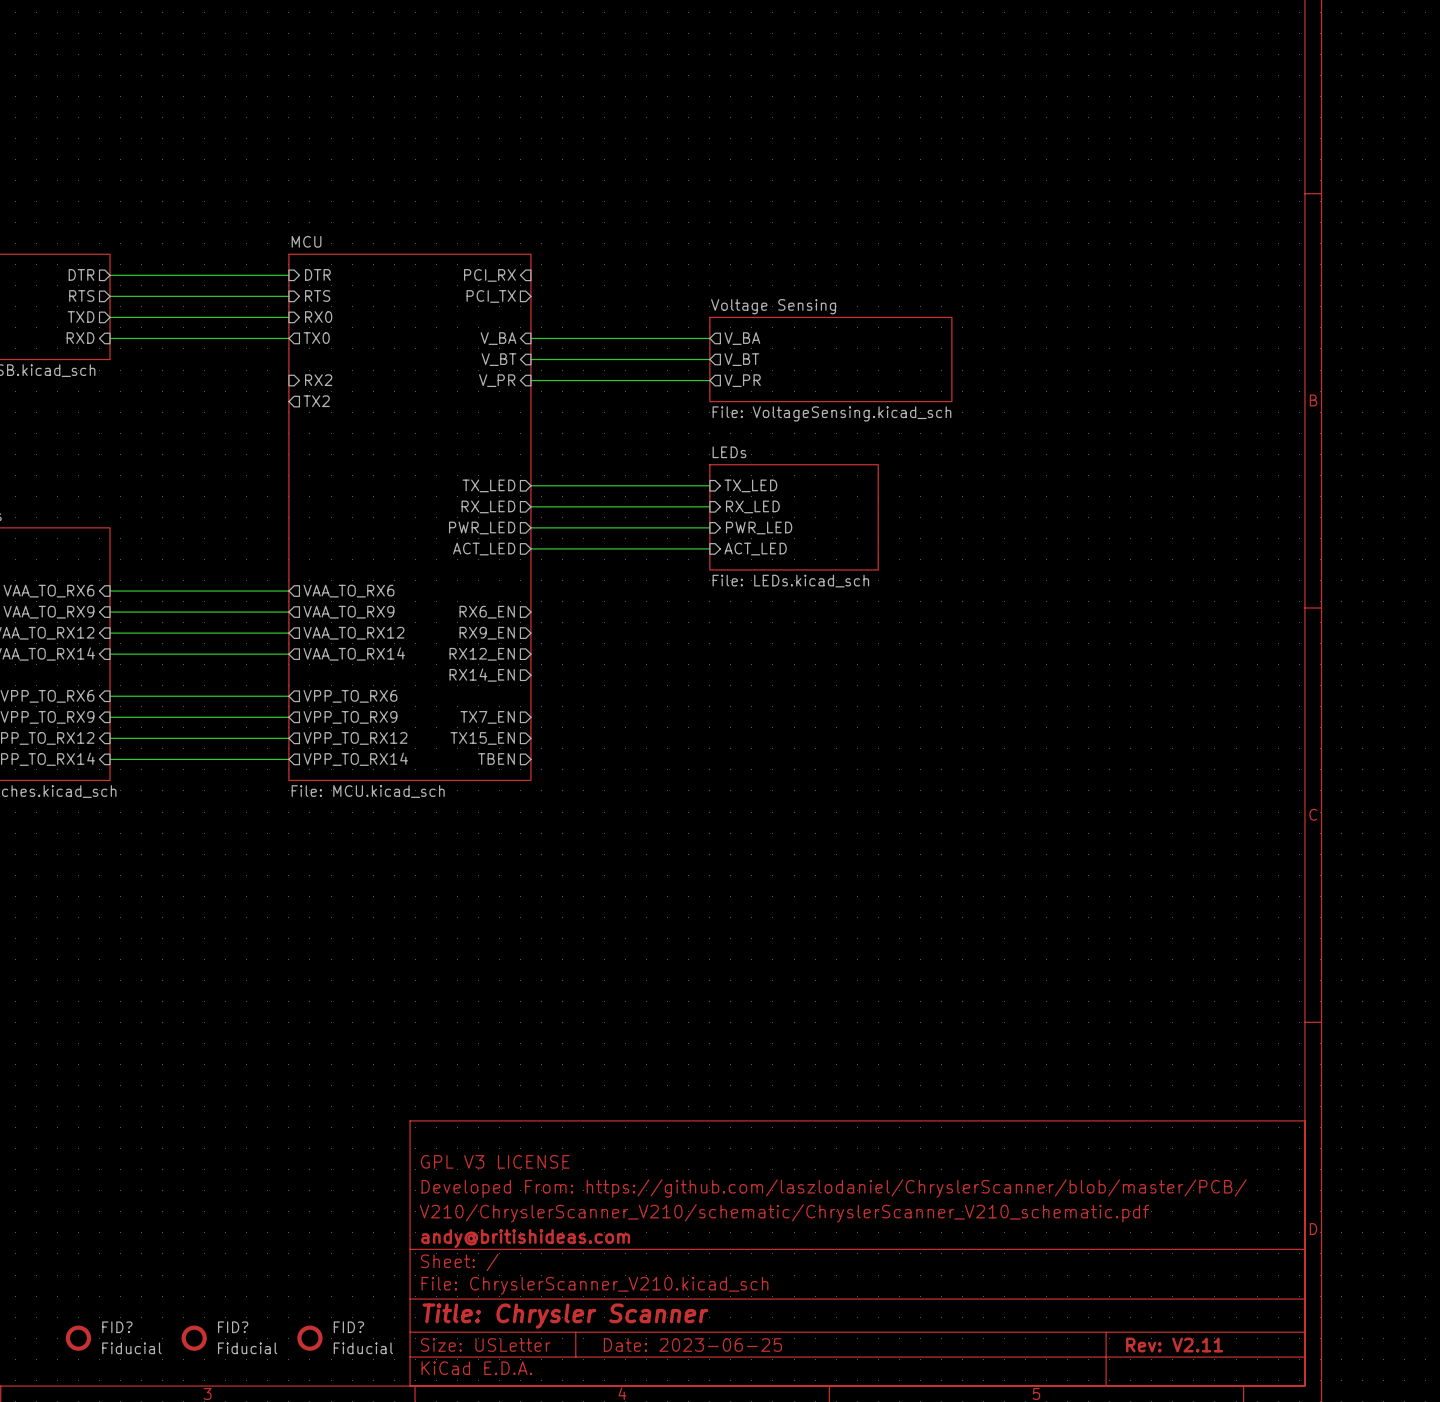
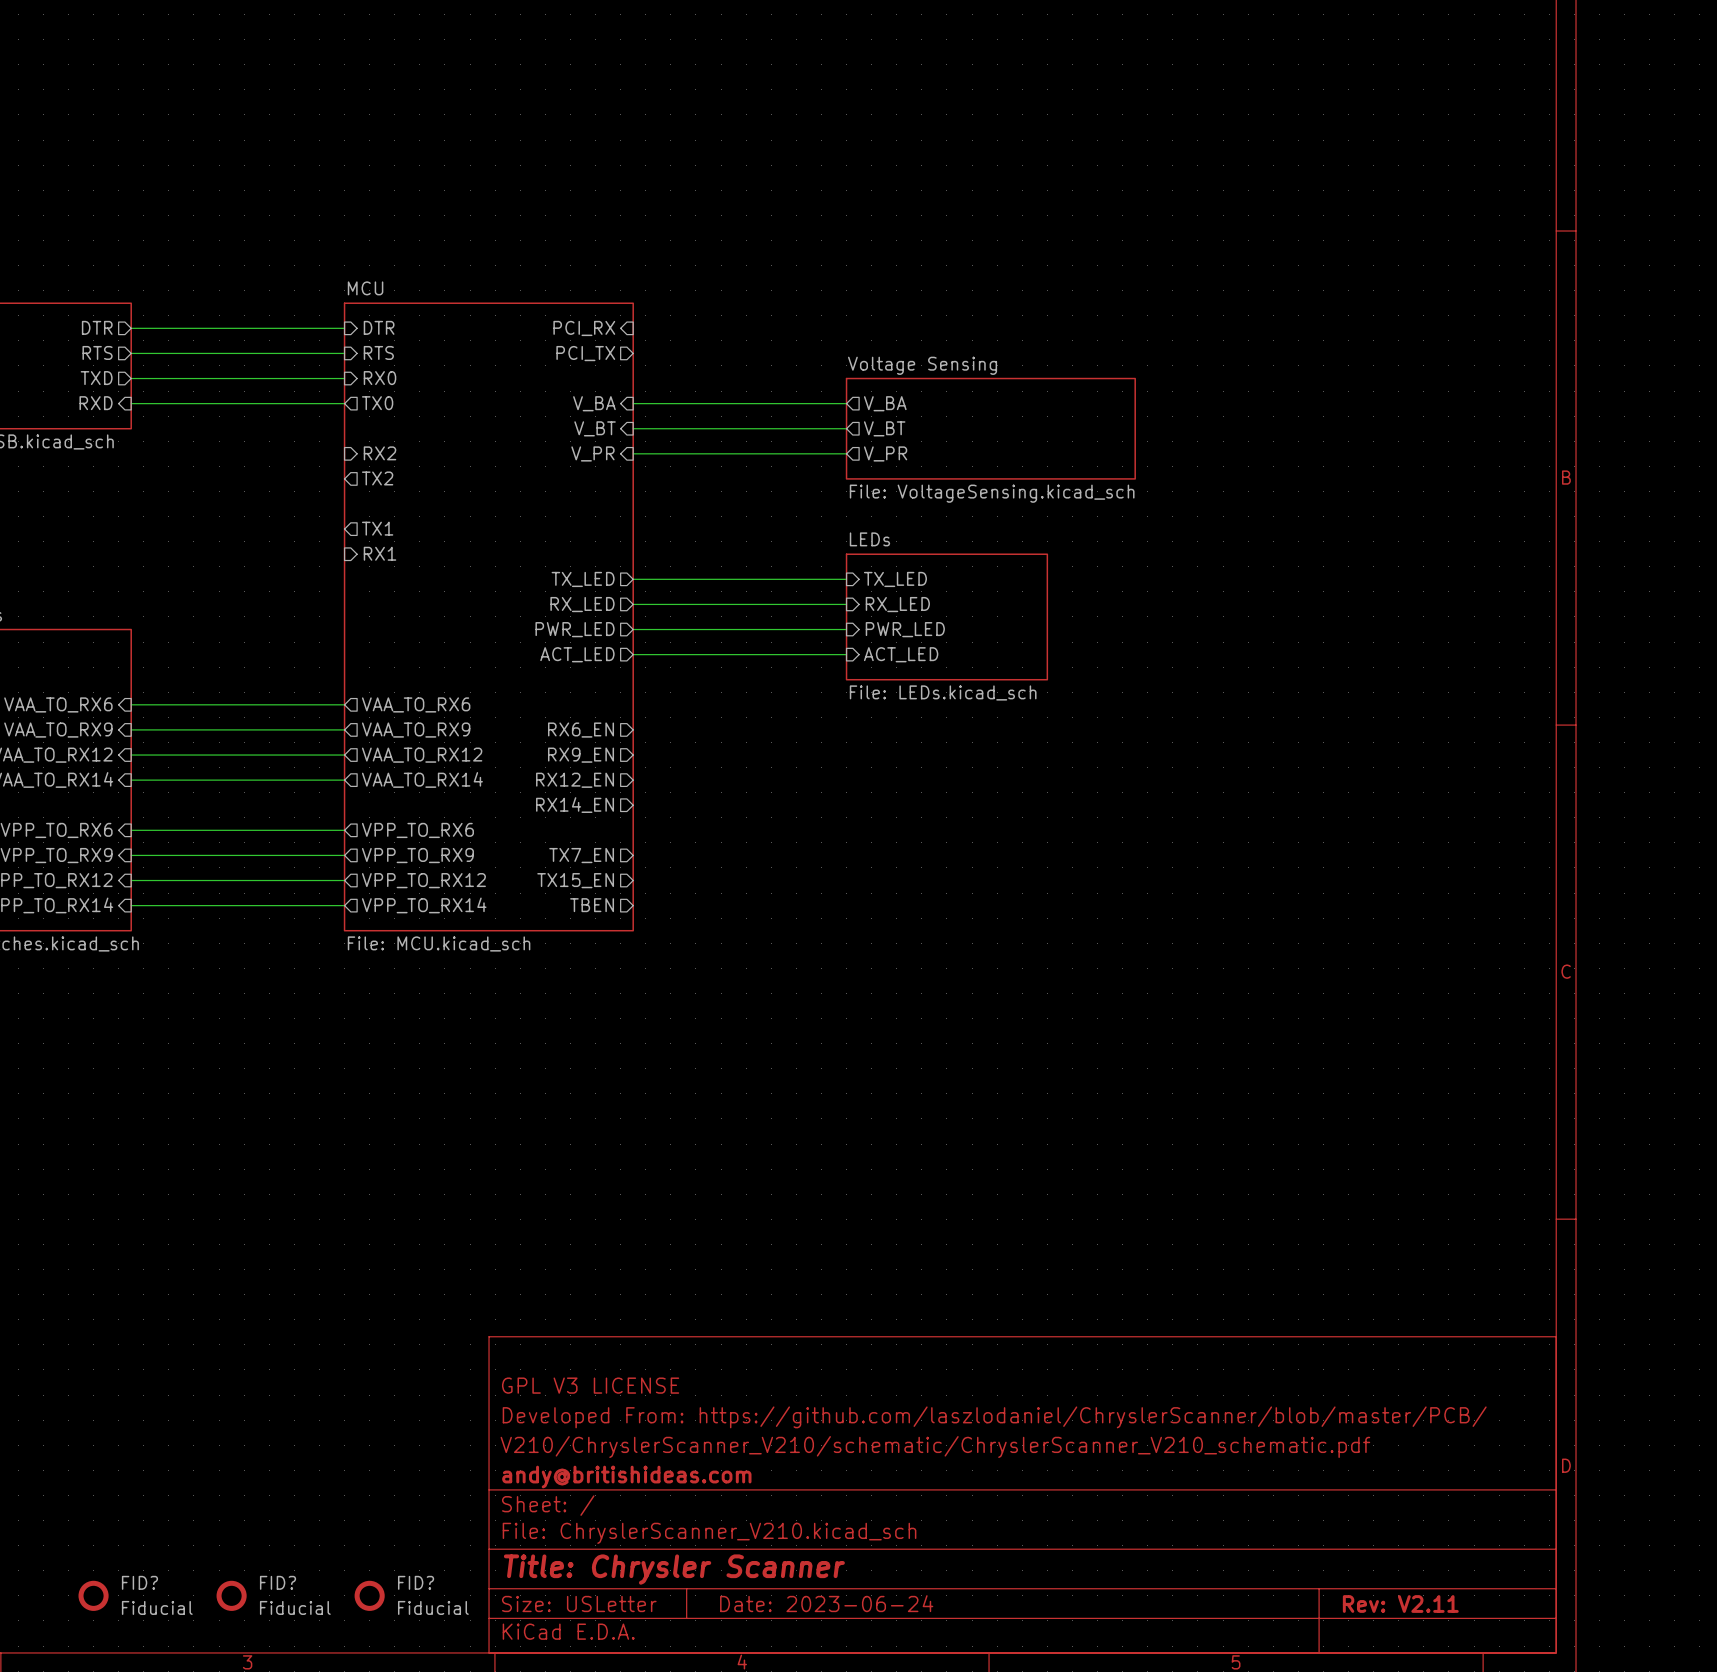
sheet pin: none -> TX1 (377, 528)
sheet pin: none -> RX1 (380, 553)
title block: Date: 2023-06-25 (692, 1345) -> Date: 2023-06-24 (826, 1603)

